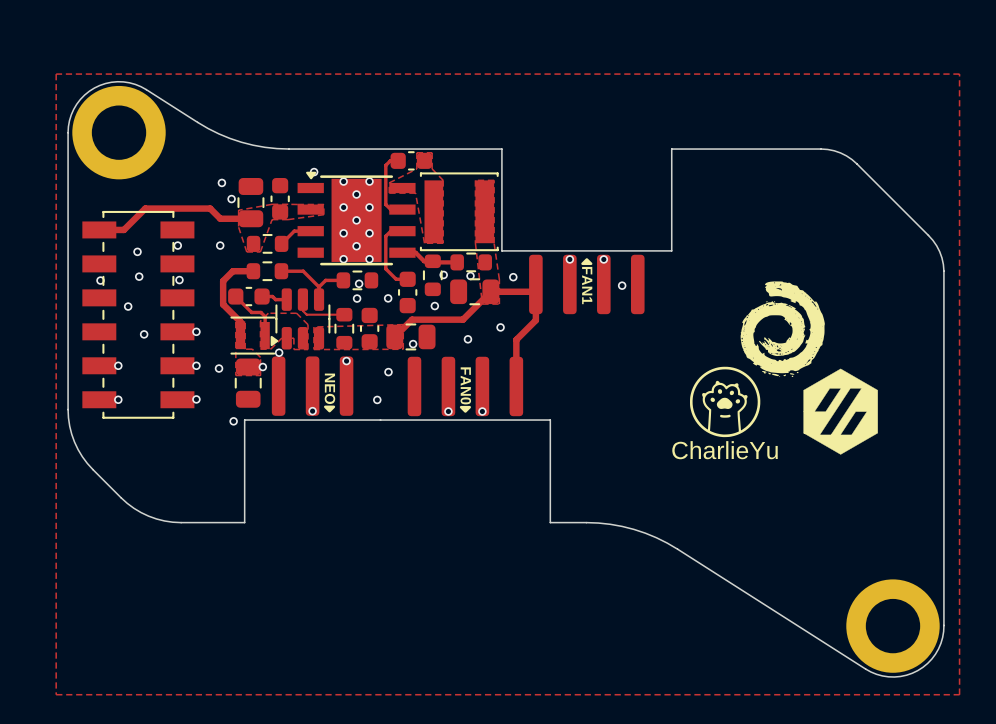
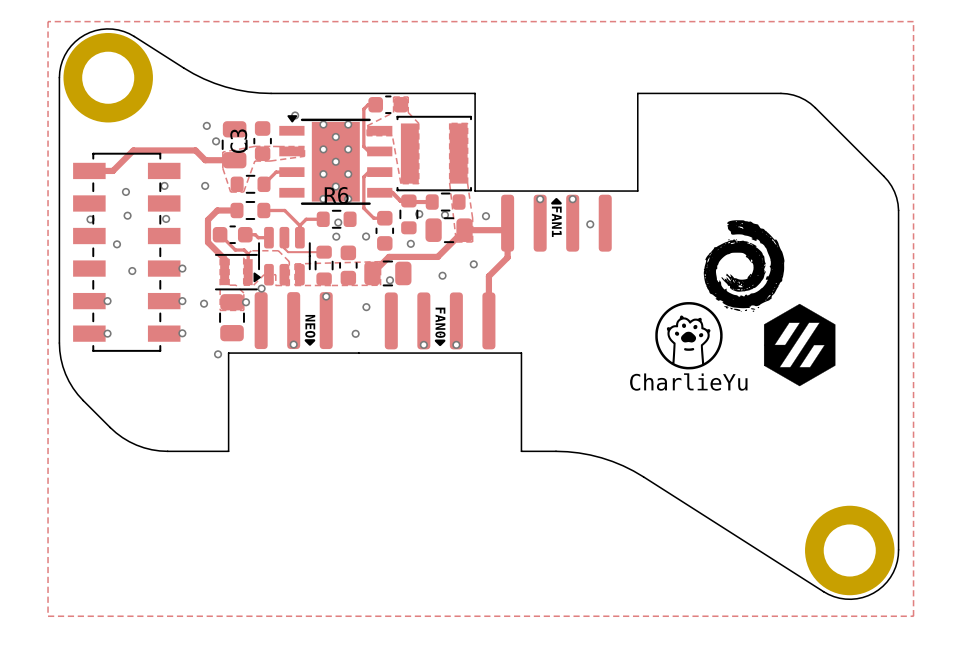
C3 name: none -> C3 (238, 141)
R6 name: none -> R6 (336, 195)

